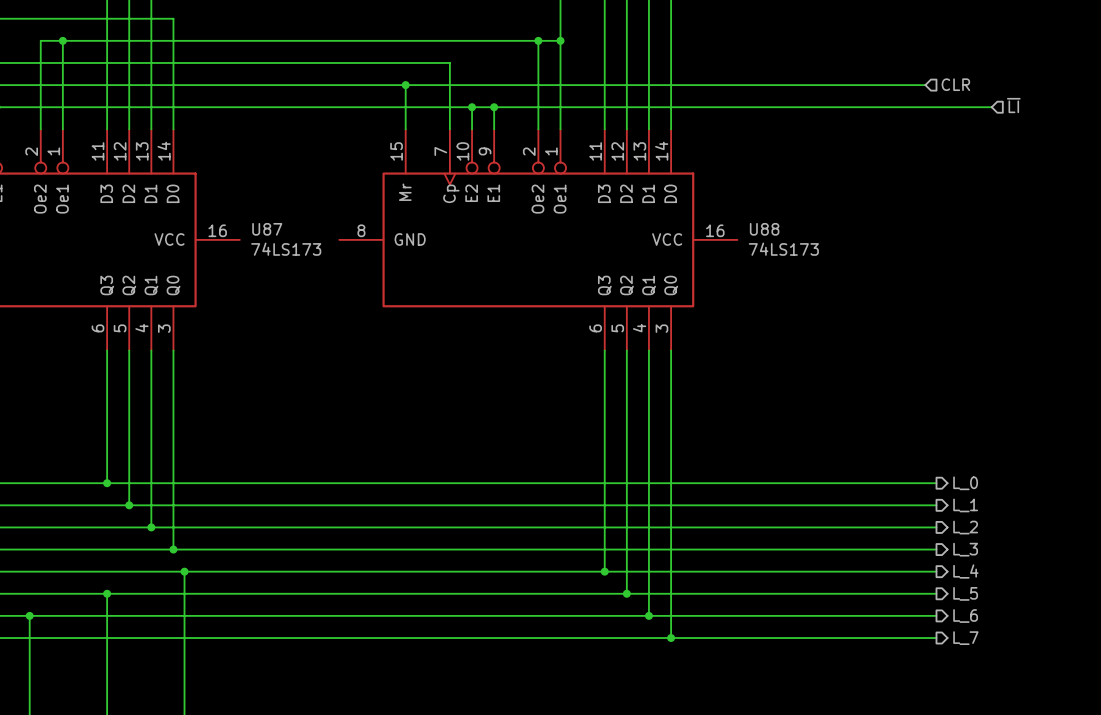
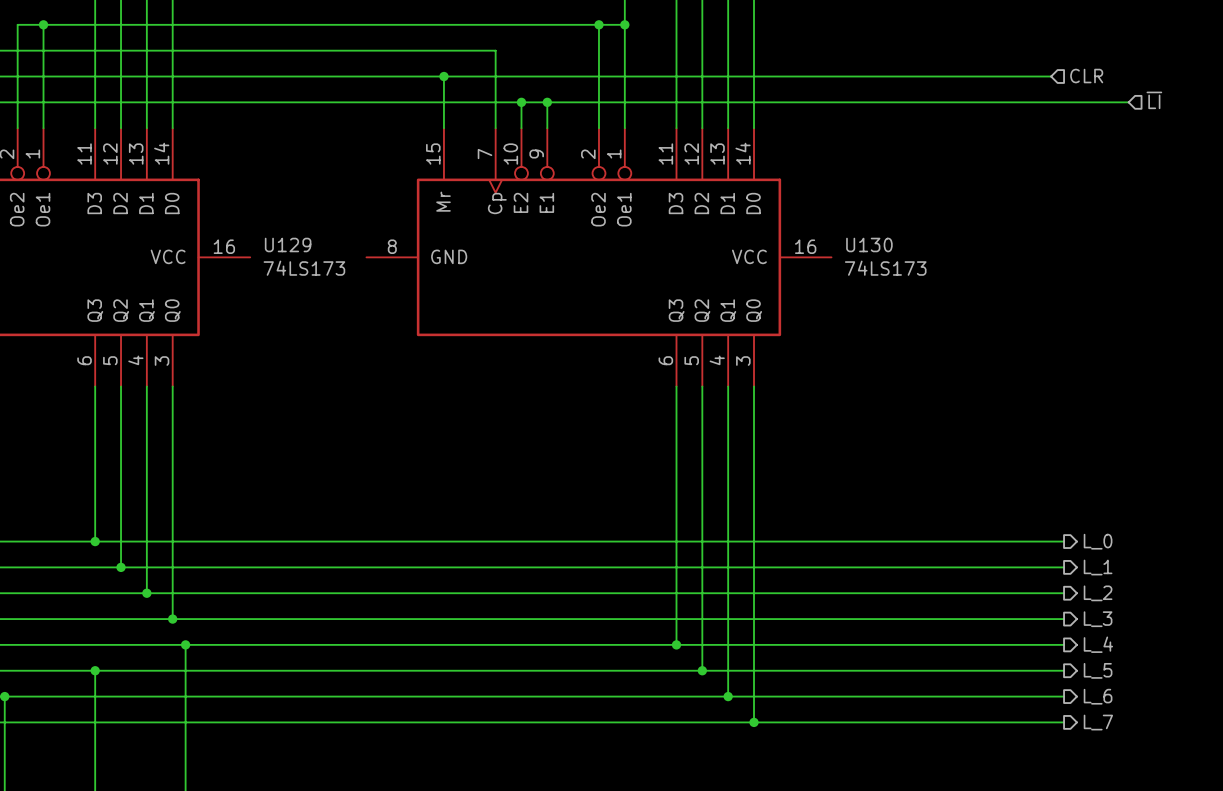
U87 name: U87 (267, 229) -> U129 (288, 244)
U88 name: U88 (764, 229) -> U130 (869, 244)

